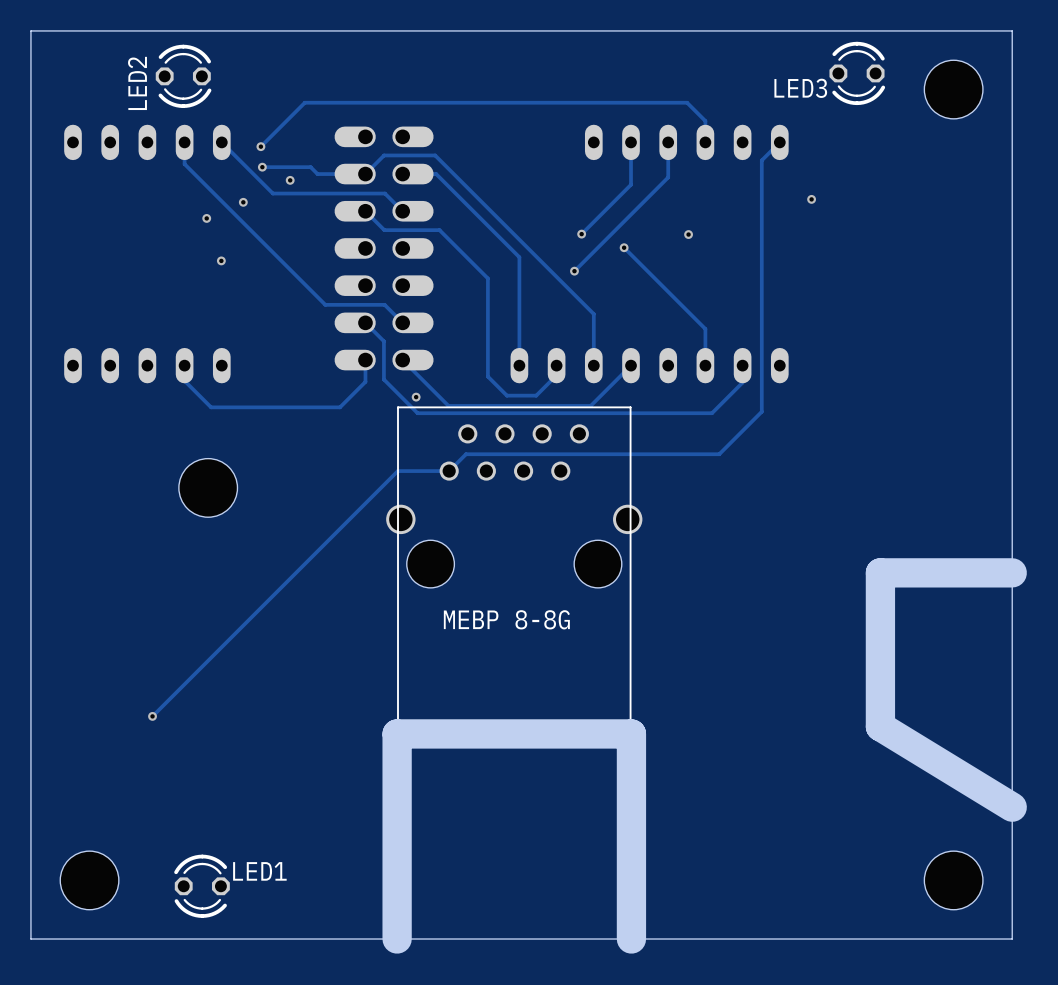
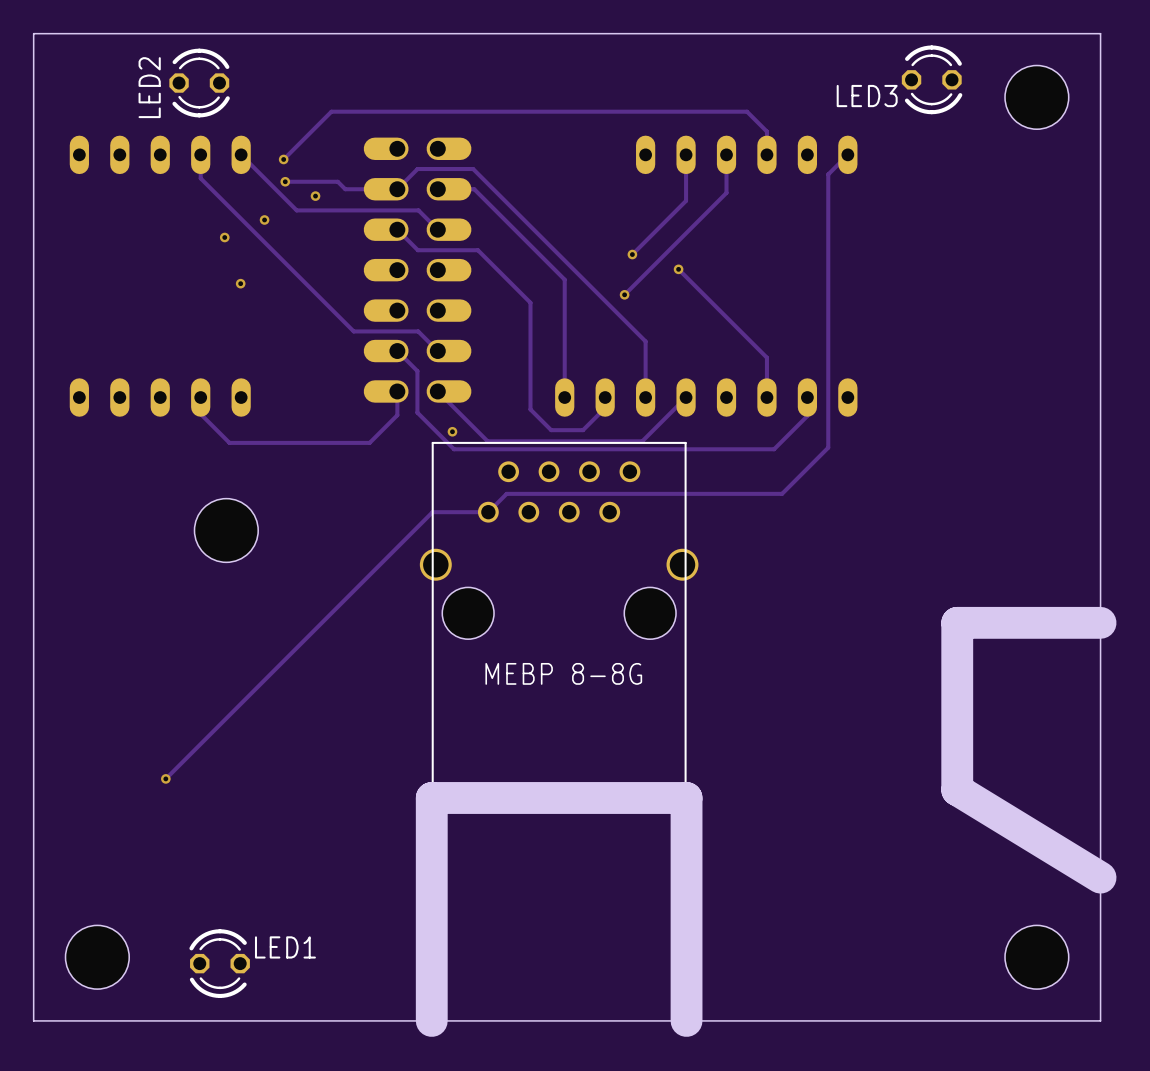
via: (811, 199) -> none
via: (688, 234) -> none

